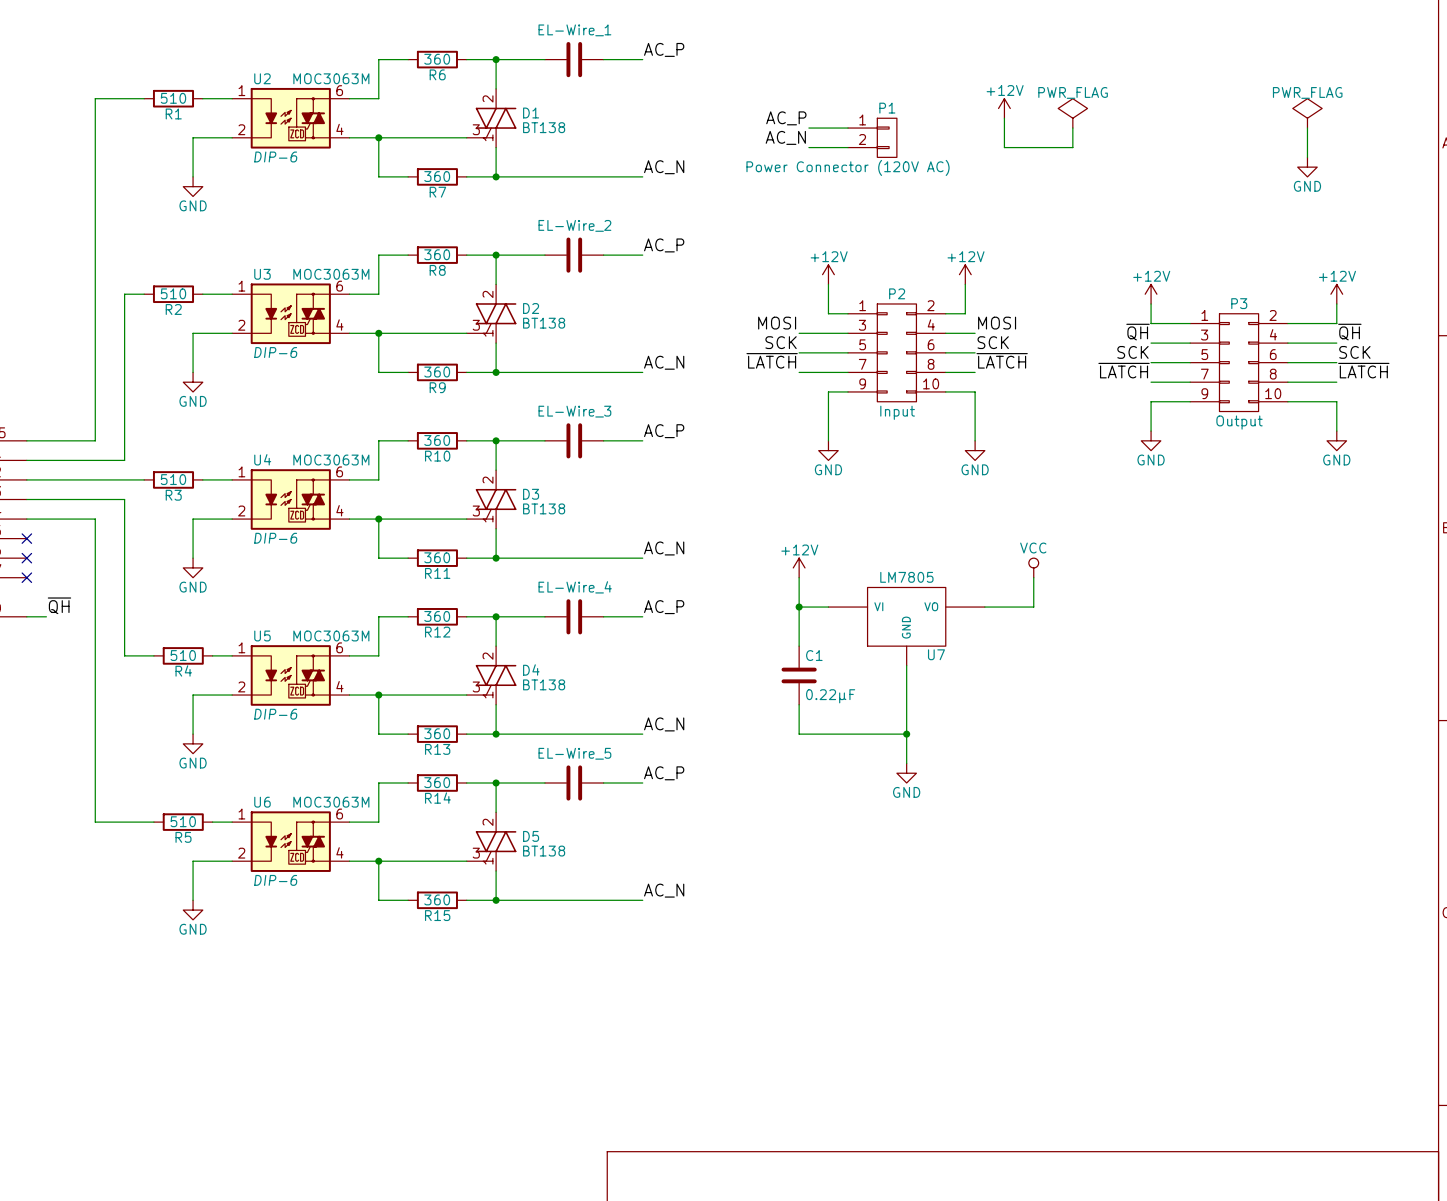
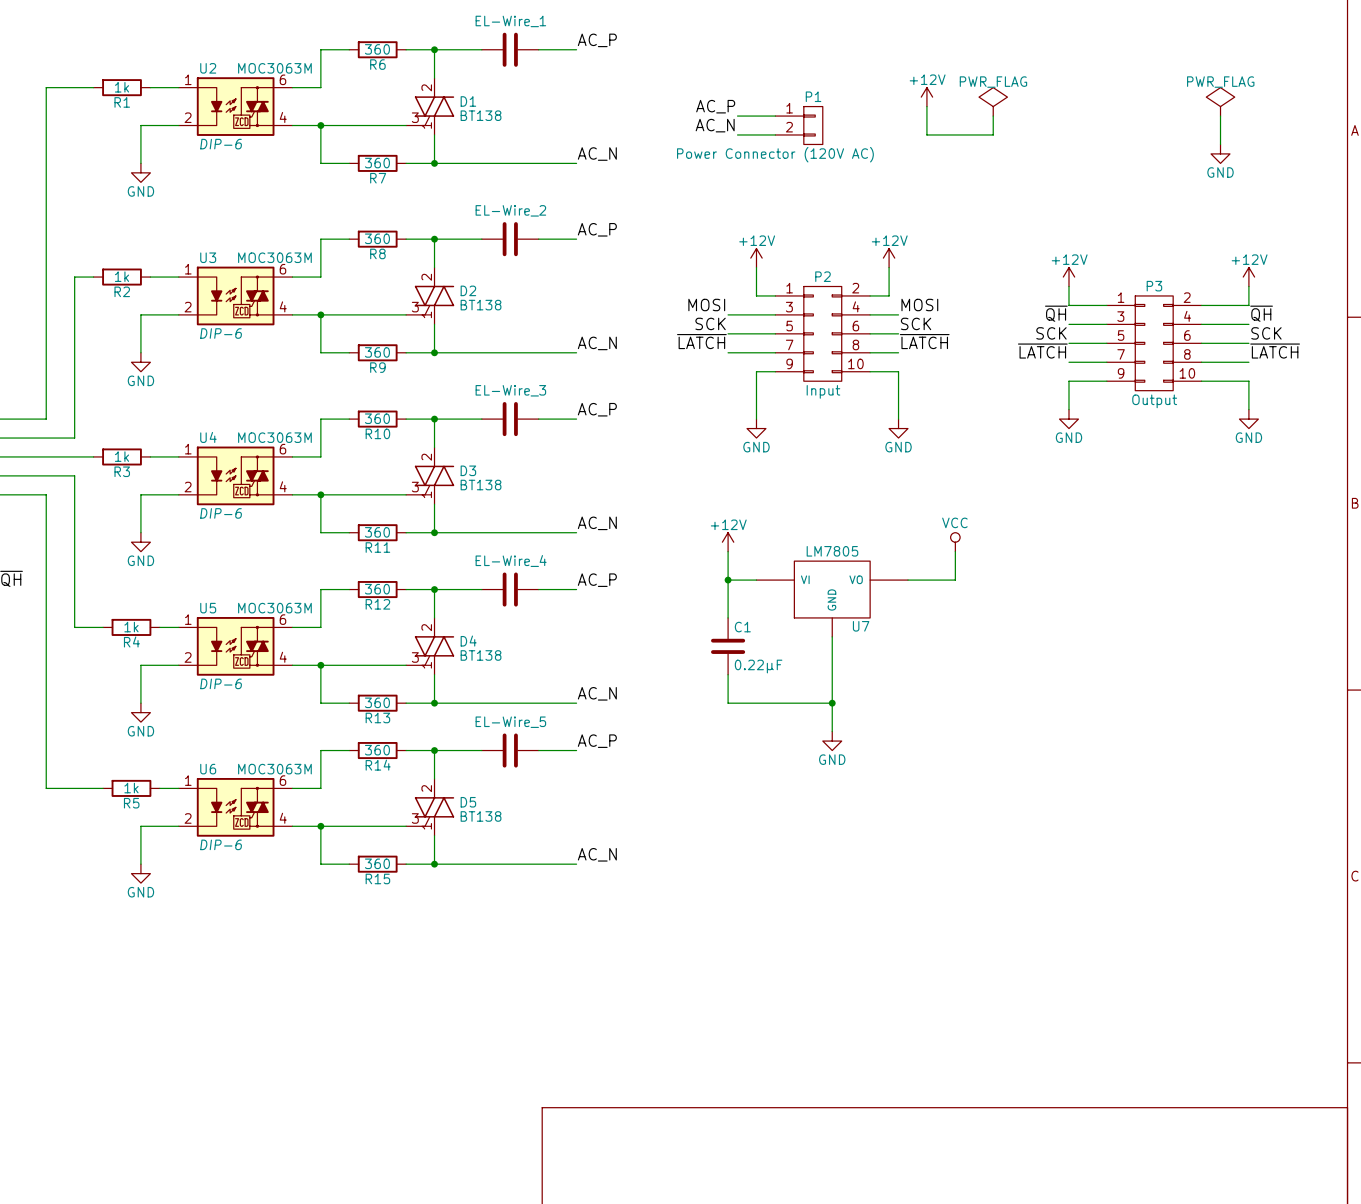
R1 value: 510 (173, 98) -> 1k (122, 87)
R2 value: 510 (173, 293) -> 1k (122, 276)
R3 value: 510 (173, 479) -> 1k (122, 456)
R4 value: 510 (183, 655) -> 1k (131, 627)
R5 value: 510 (183, 821) -> 1k (131, 788)

